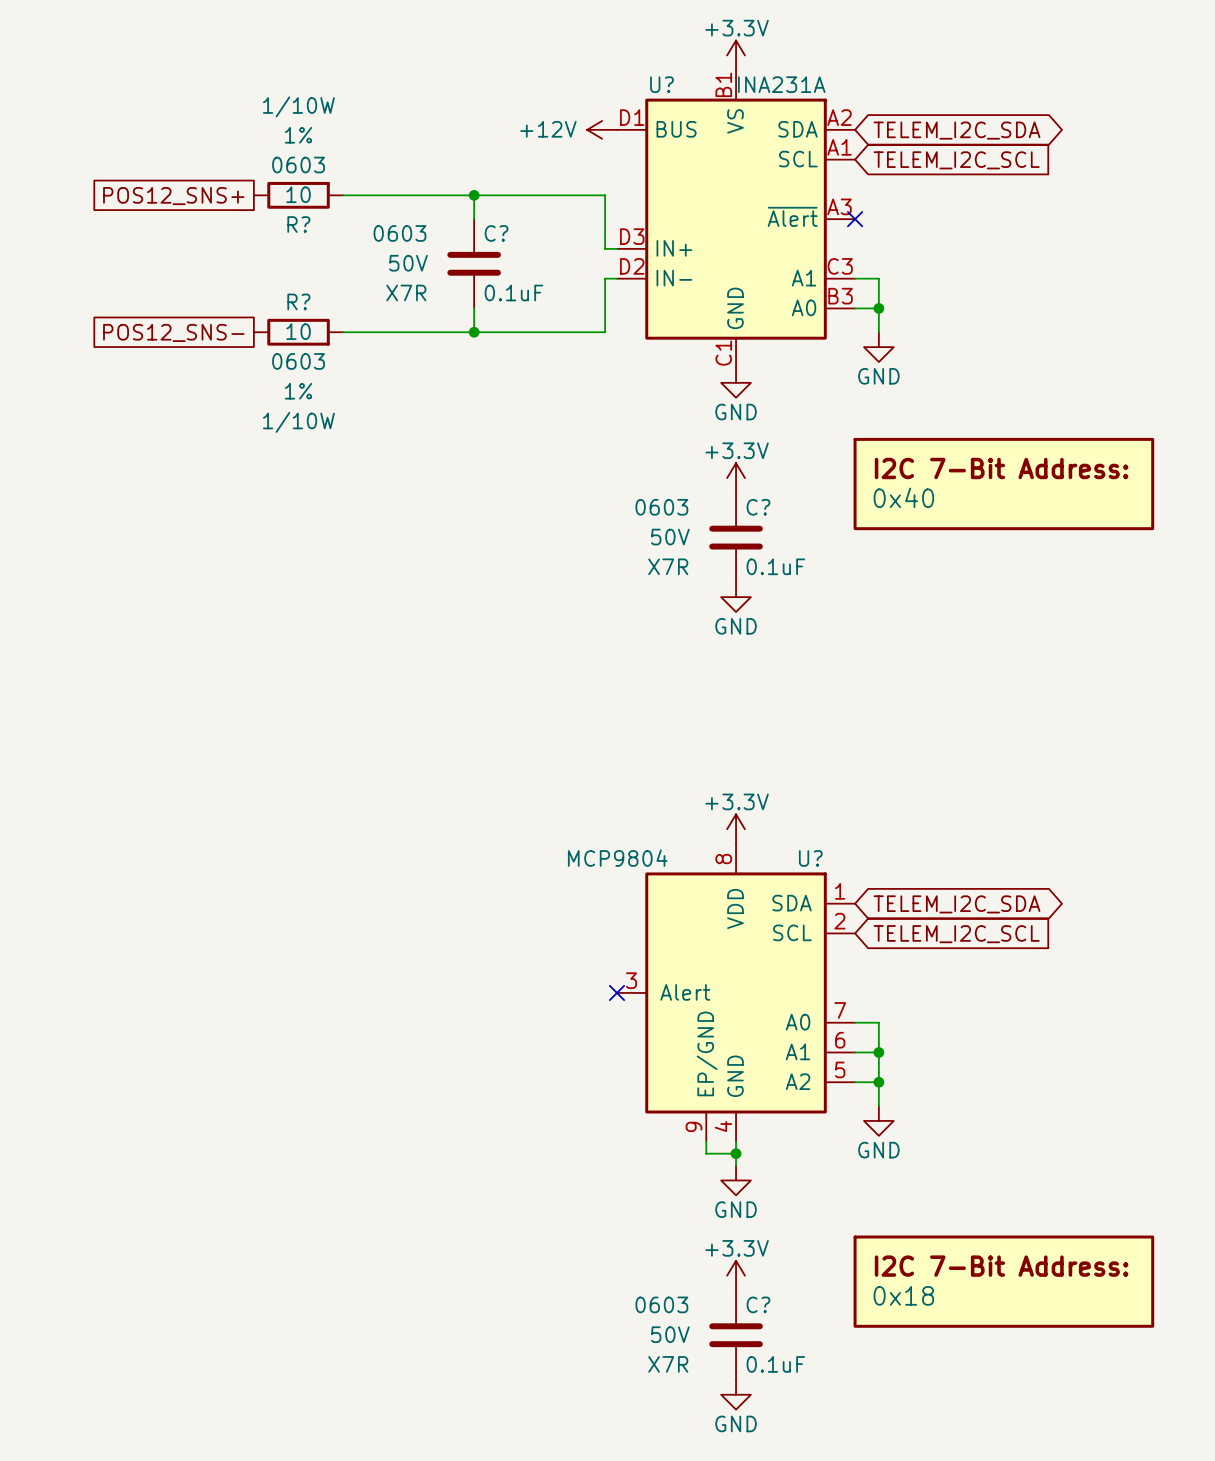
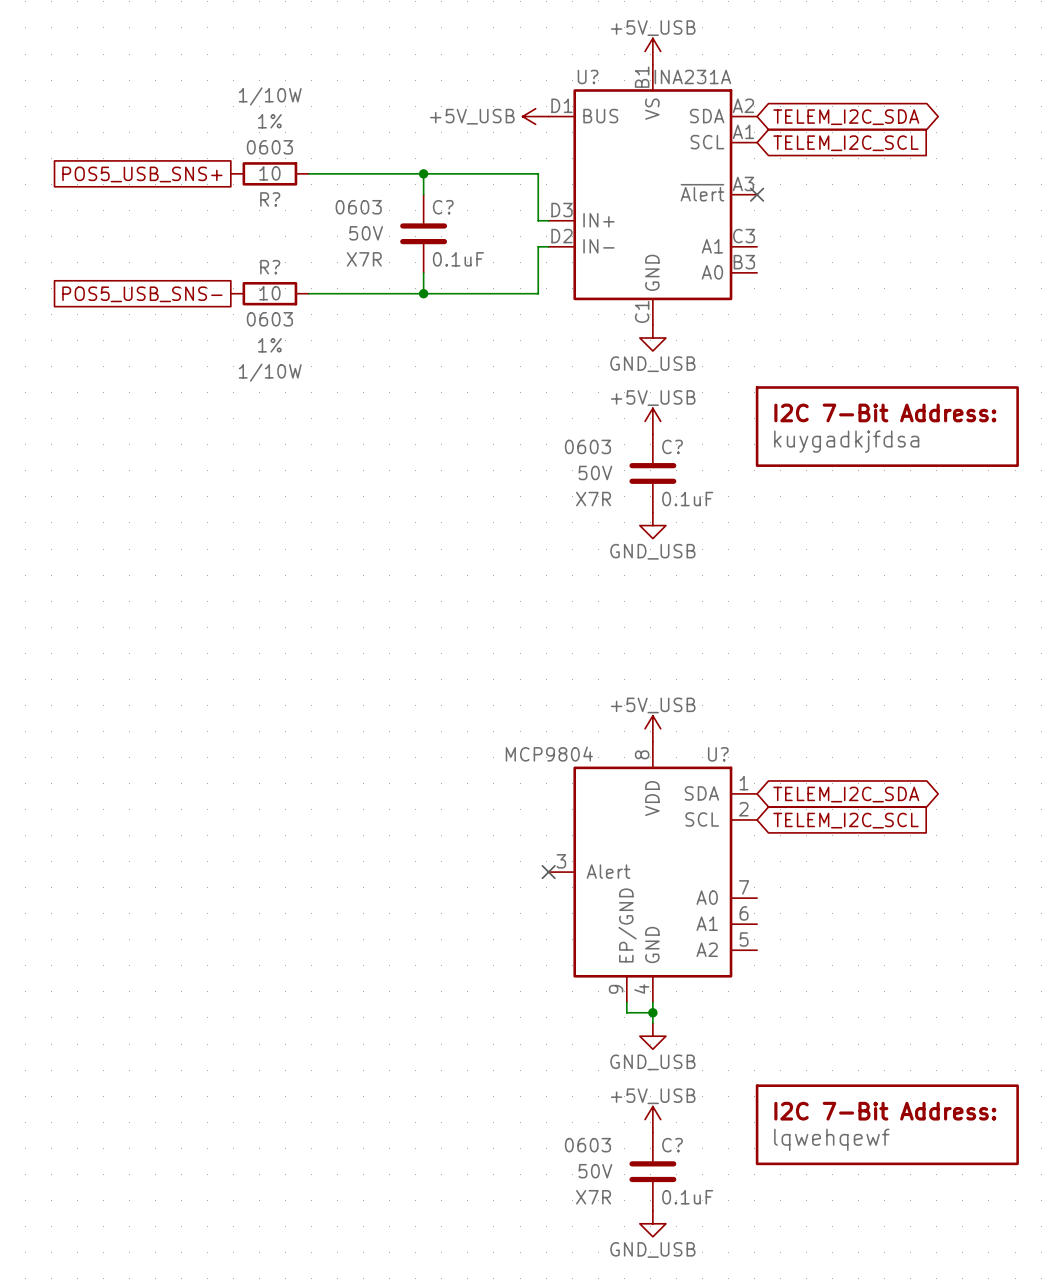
power symbol: +3.3V (736, 55) -> +5V_USB (652, 51)
power symbol: +12V (602, 129) -> +5V_USB (535, 116)
global label: POS12_SNS+ (173, 196) -> POS5_USB_SNS+ (142, 174)
wire: (855, 278) (878, 278) (878, 332) -> none
wire: (855, 308) (878, 308) -> none
junction: (878, 308) -> none
global label: POS12_SNS- (173, 332) -> POS5_USB_SNS- (142, 294)
power symbol: GND (878, 347) -> none
power symbol: GND (736, 382) -> GND_USB (652, 338)
power symbol: +3.3V (736, 478) -> +5V_USB (652, 421)
part value: 0x40 (903, 497) -> kuygadkjfdsa (846, 441)
power symbol: GND (736, 597) -> GND_USB (652, 525)
power symbol: +3.3V (736, 829) -> +5V_USB (652, 728)
wire: (855, 1022) (878, 1022) (878, 1106) -> none
wire: (855, 1052) (878, 1052) -> none
junction: (878, 1052) -> none
wire: (855, 1082) (878, 1082) -> none
junction: (878, 1082) -> none
power symbol: GND (878, 1120) -> none
power symbol: GND (736, 1180) -> GND_USB (652, 1036)
power symbol: +3.3V (736, 1275) -> +5V_USB (652, 1119)
part value: 0x18 (903, 1295) -> lqwehqewf (831, 1139)
power symbol: GND (736, 1394) -> GND_USB (652, 1223)

